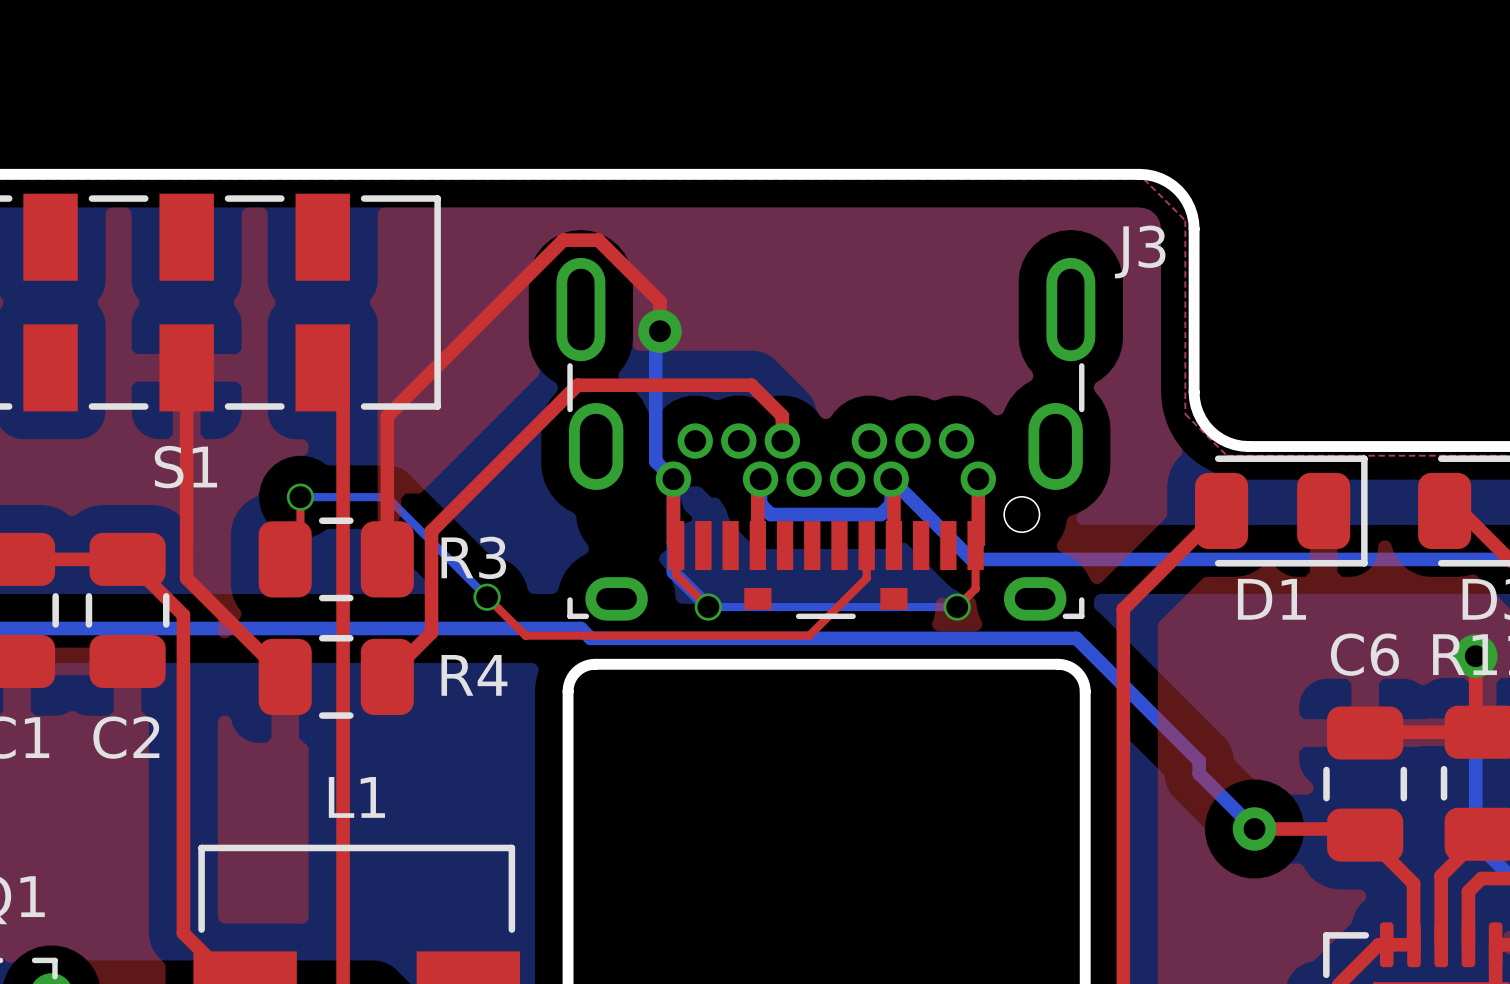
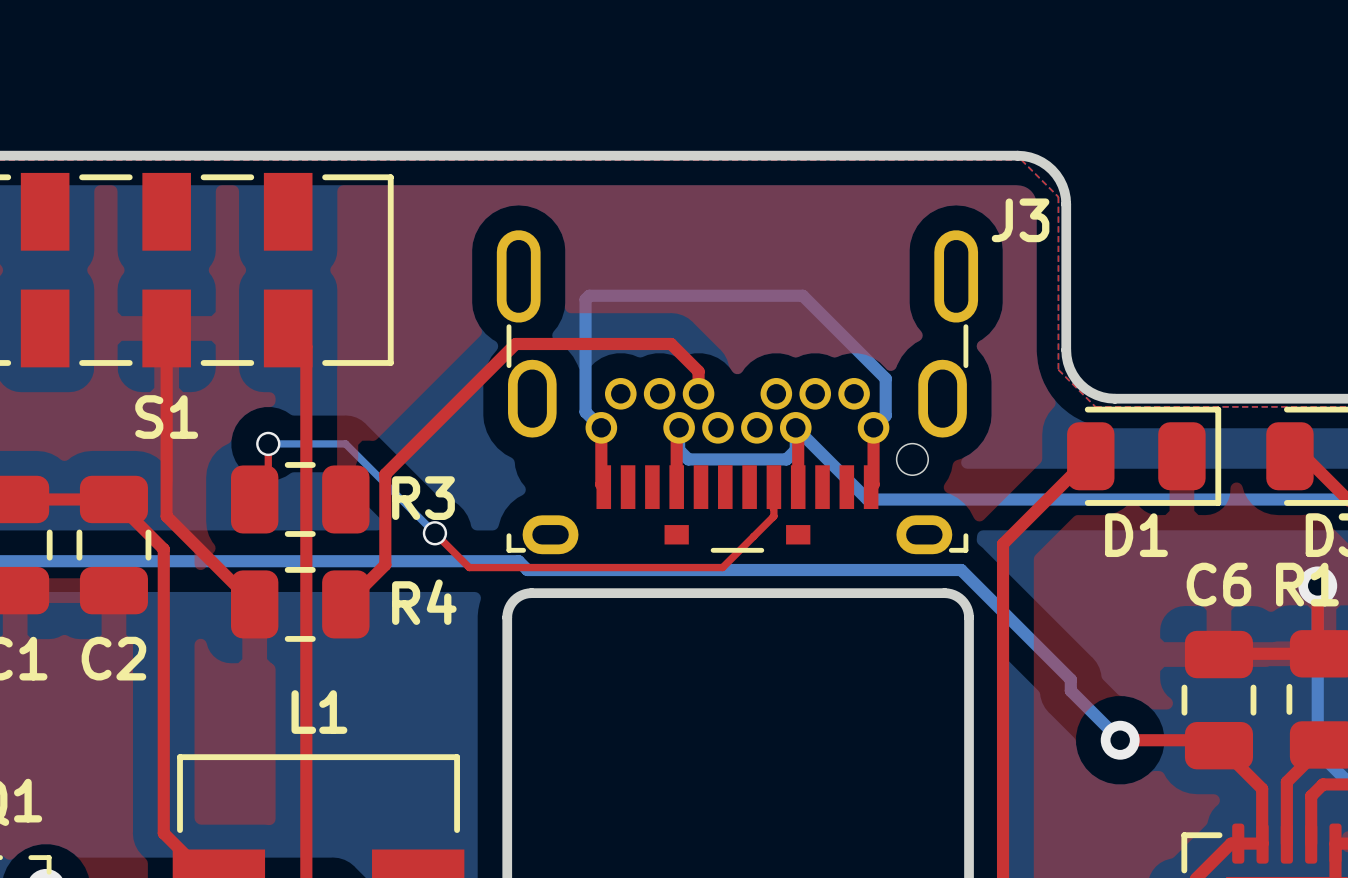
top track: (659, 331) (659, 301) (598, 240) (563, 240) (387, 416) (387, 559) -> none
bottom track: none -> (589, 295) (802, 295) (885, 378) (885, 415) (873, 427)
via: (659, 331) -> none
bottom track: (673, 479) (673, 572) (708, 607) (957, 607) -> none
top track: (676, 545) (676, 574) (708, 607) -> none
top track: (975, 545) (975, 588) (957, 607) -> none
via: (708, 607) -> none
via: (957, 607) -> none

